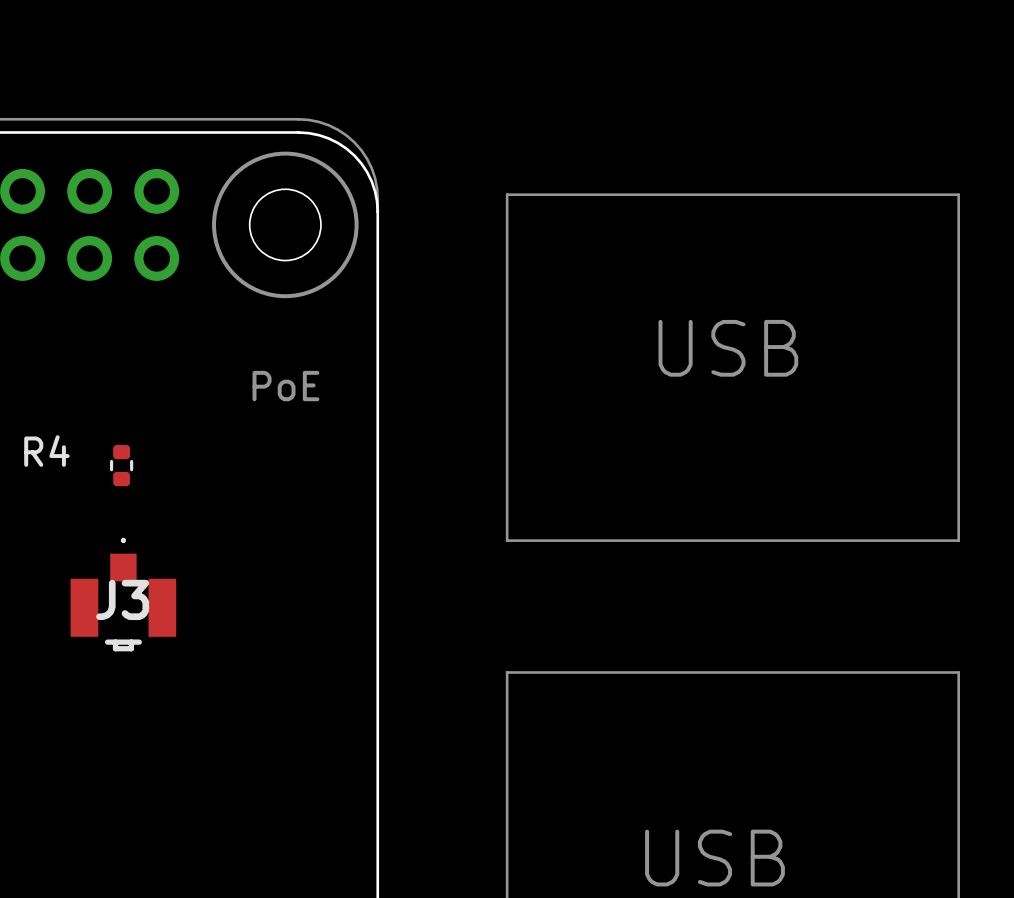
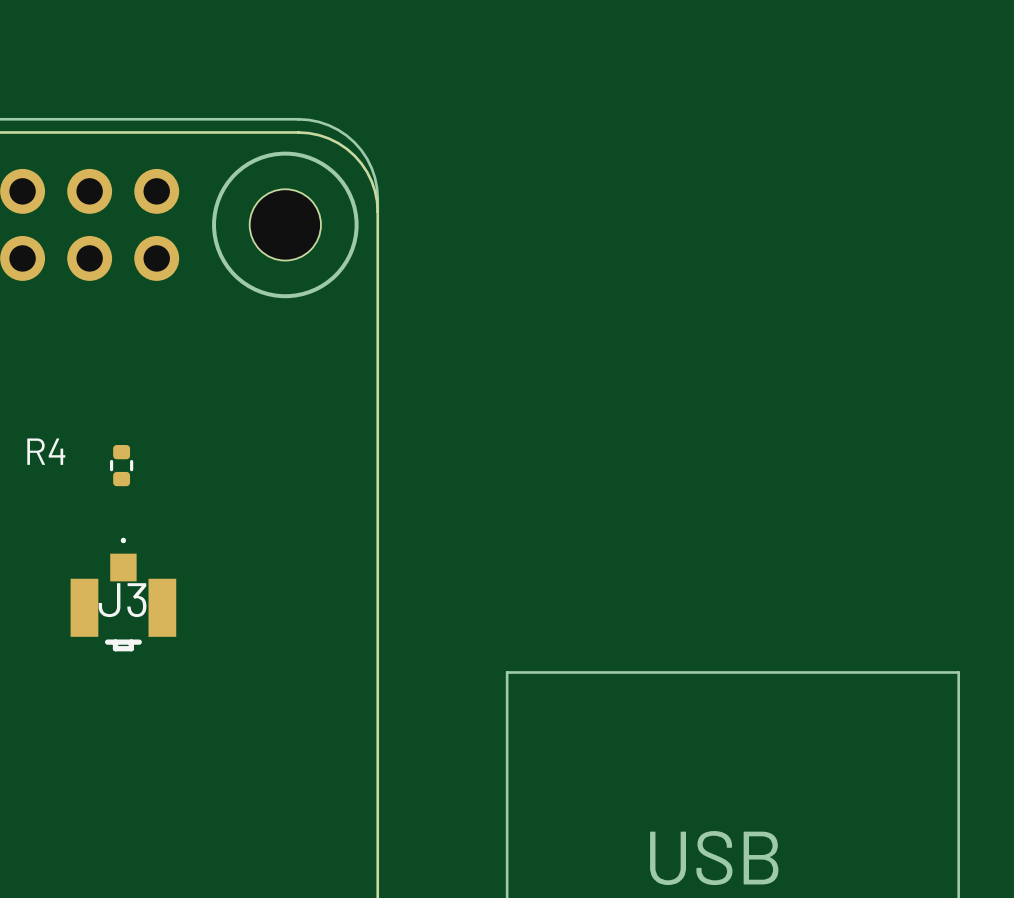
line: (507, 194) (507, 540) (958, 540) (958, 194) (507, 194) -> none
text: USB (728, 348) -> none
text: PoE (285, 386) -> none

